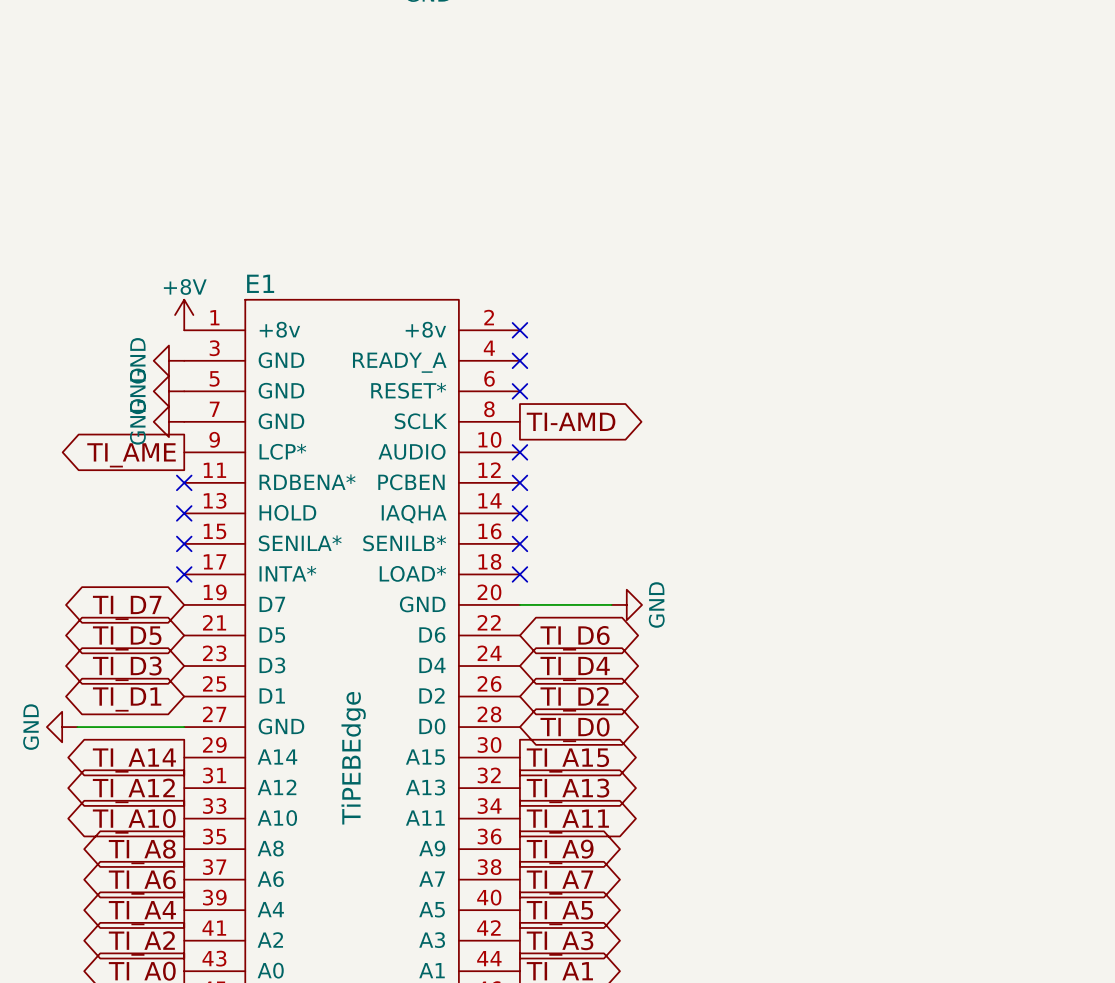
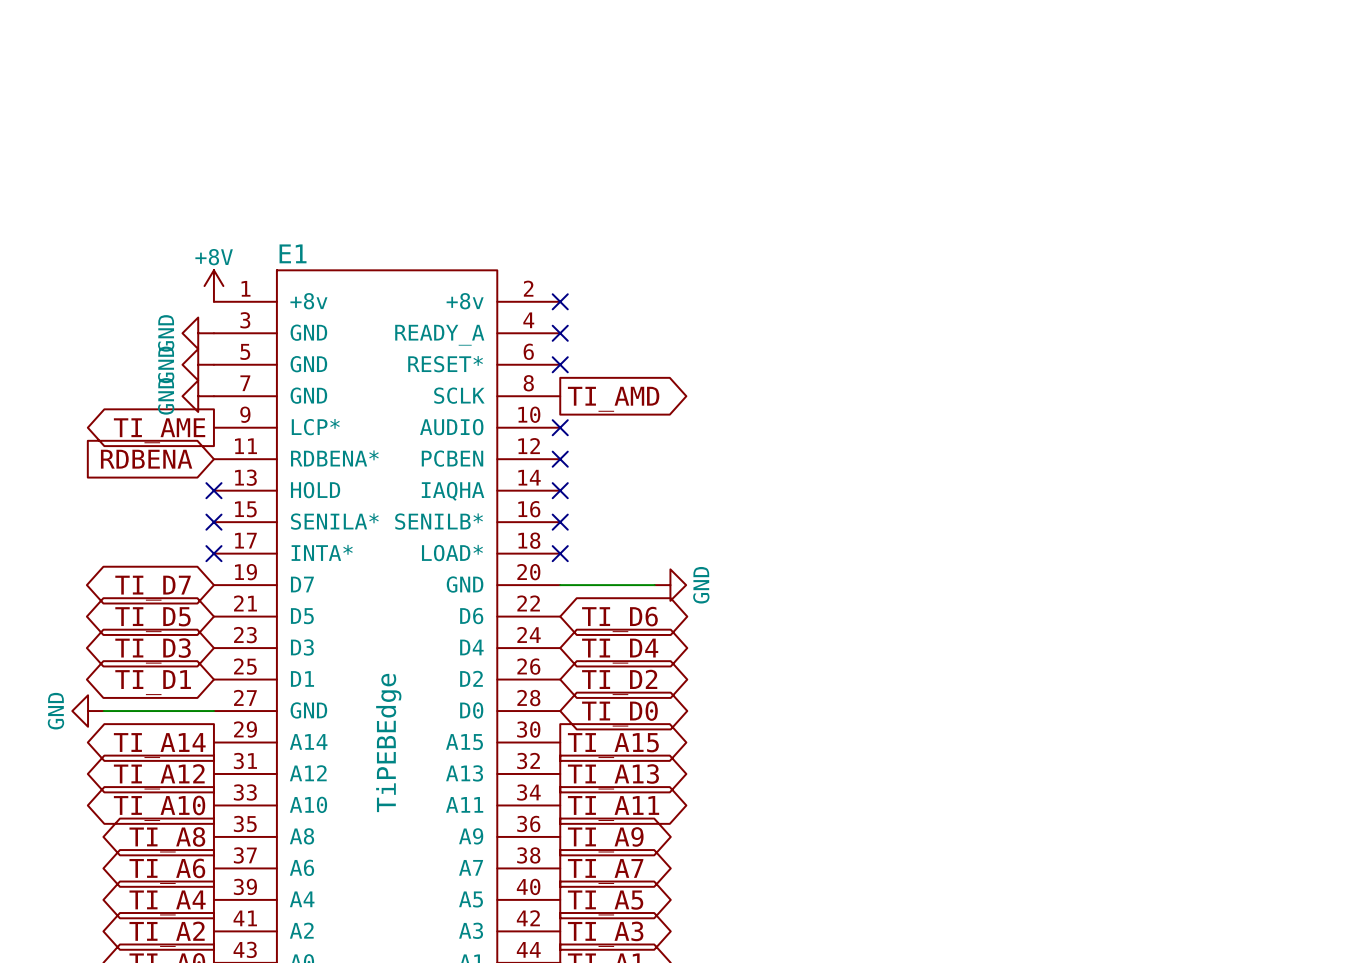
global label: TI-AMD (571, 421) -> TI_AMD (613, 399)
global label: none -> RDBENA (146, 459)
no-connect mark: (184, 482) -> none

